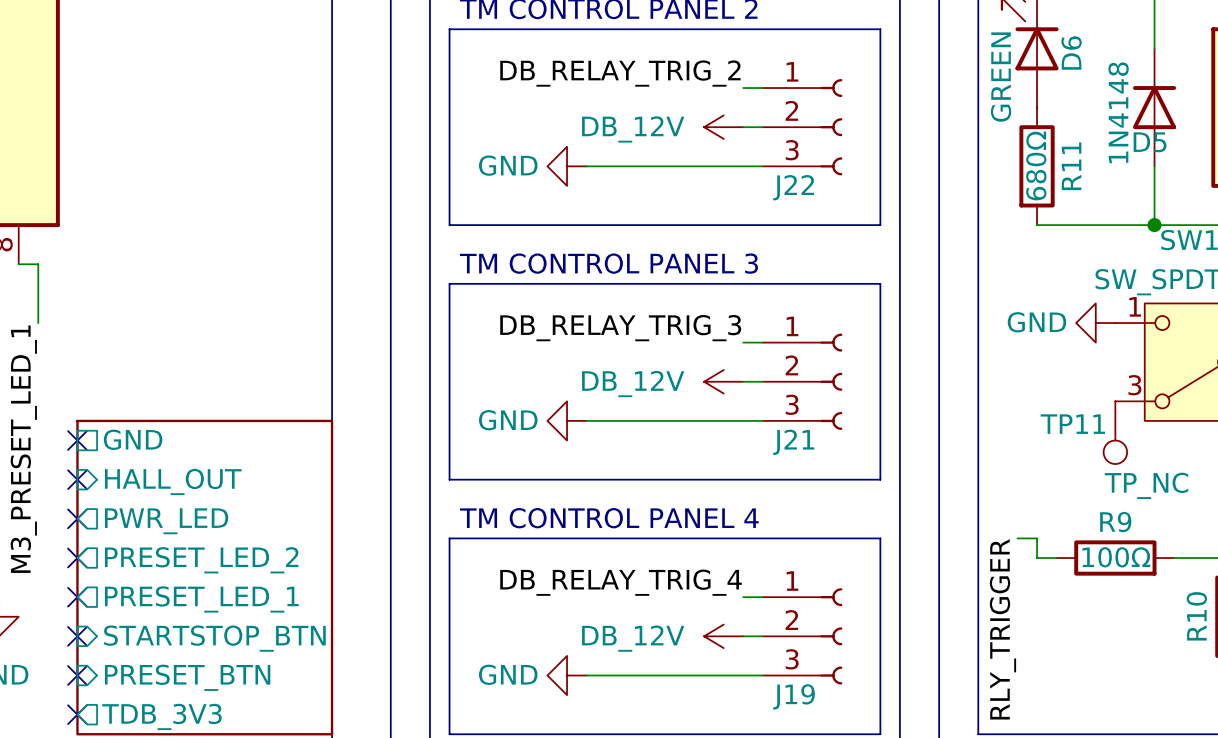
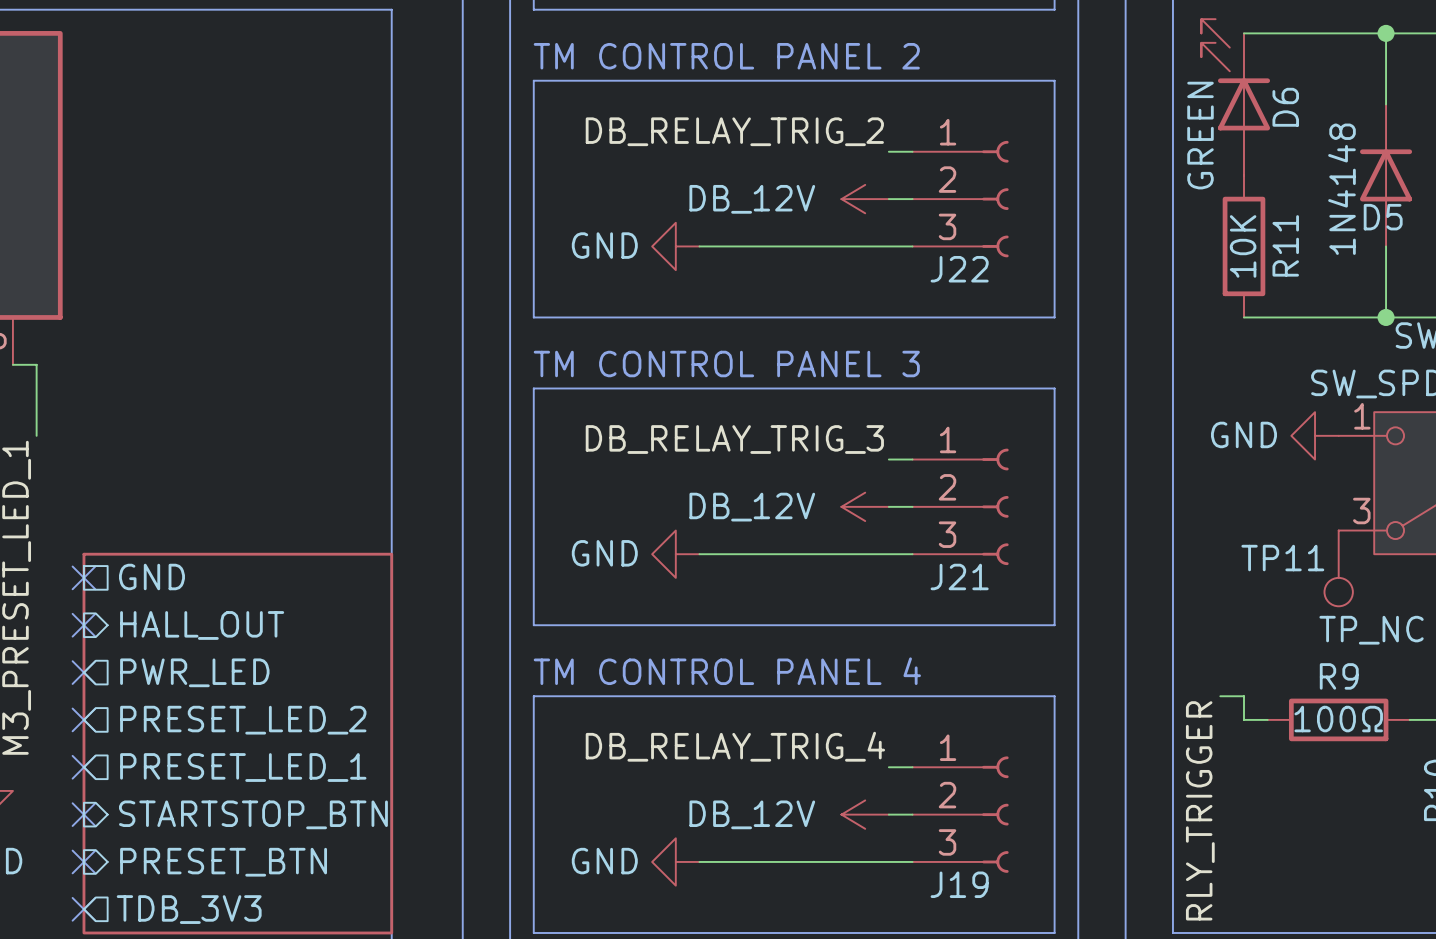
R11 value: 680Ω (1036, 165) -> 10K (1243, 246)

